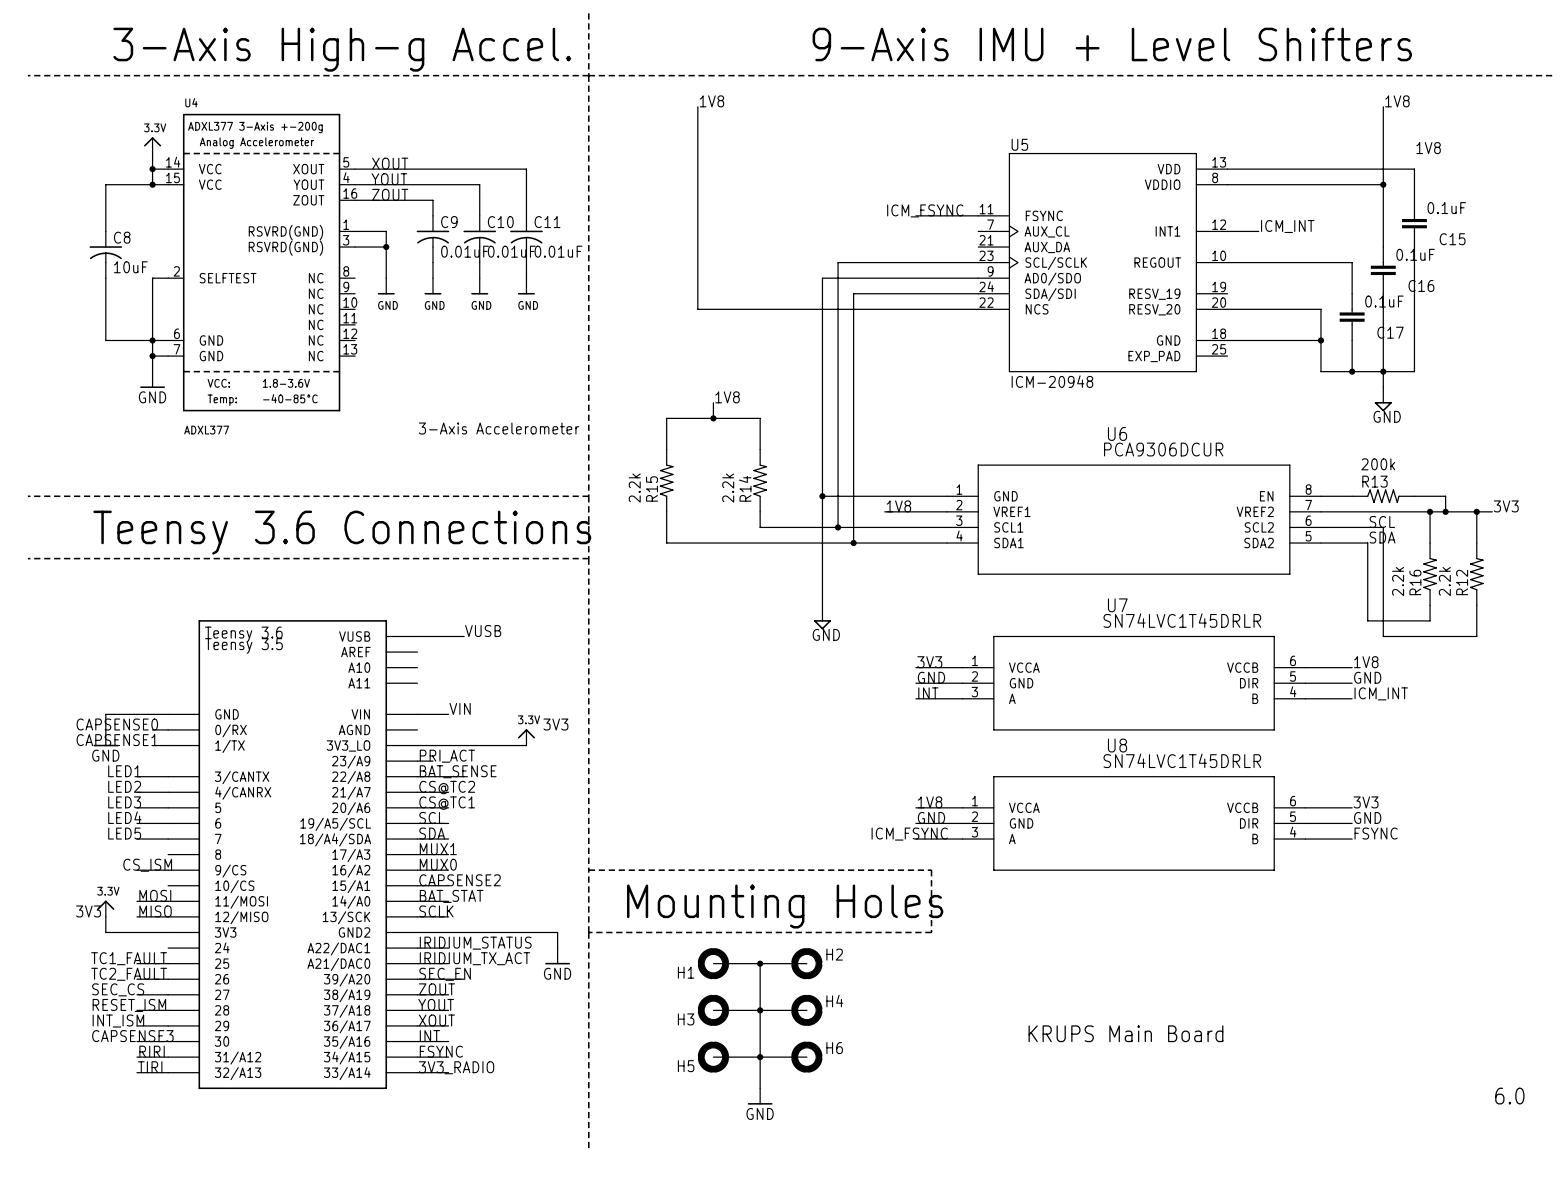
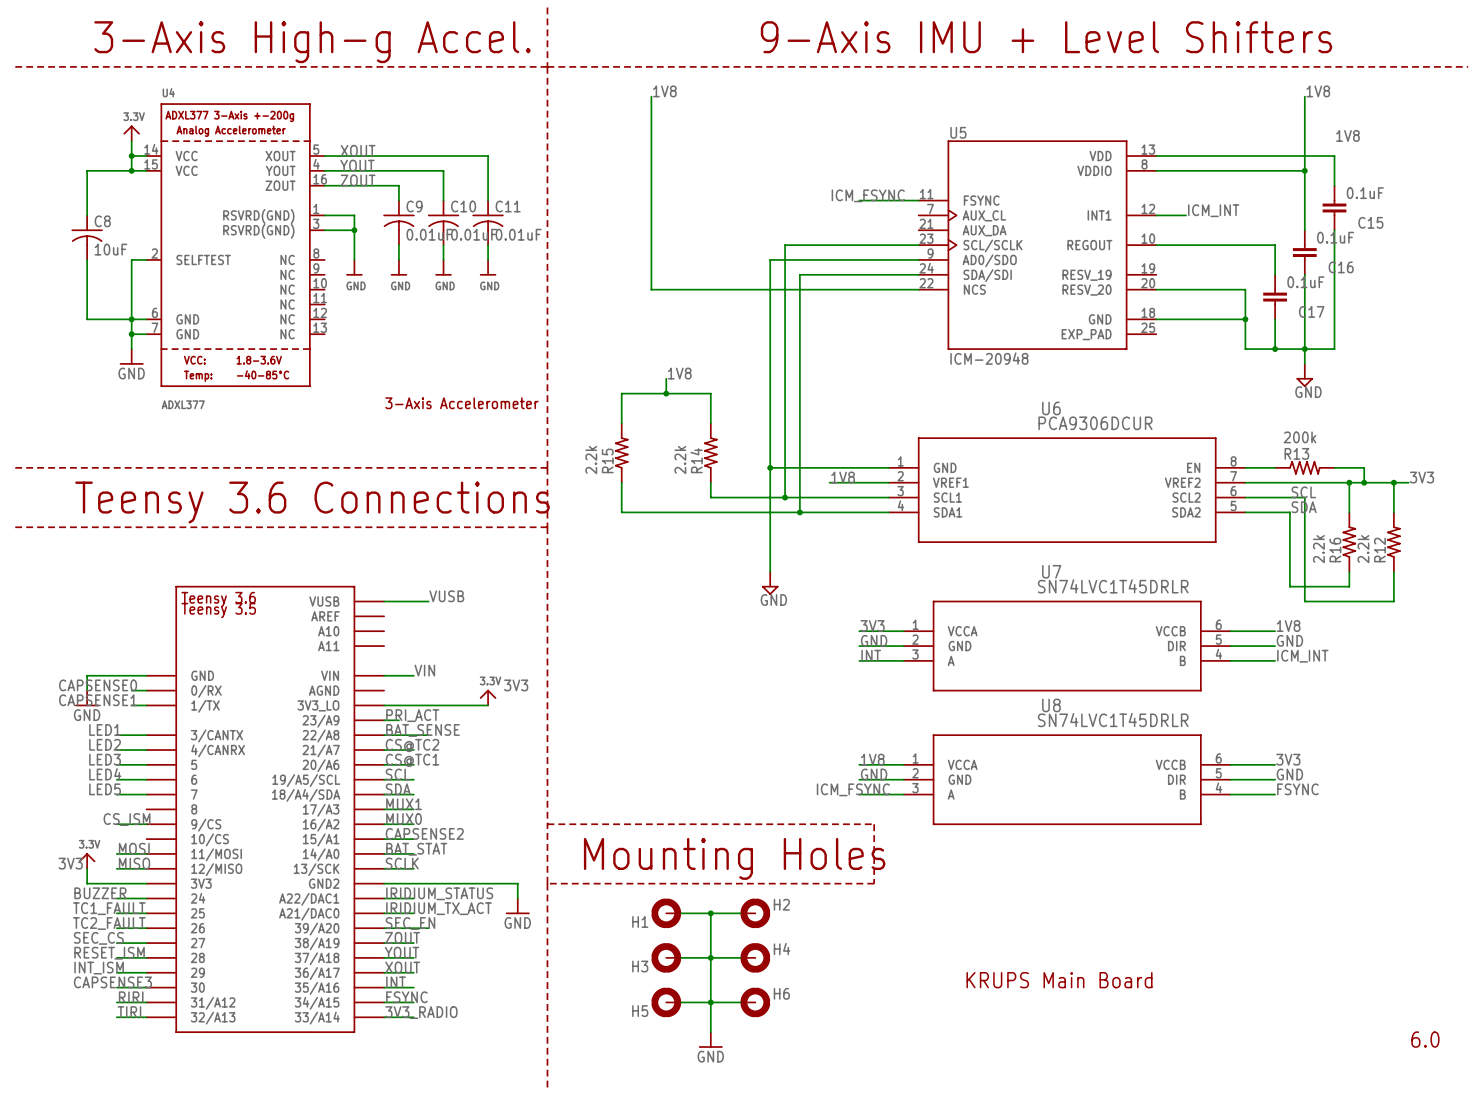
label: none -> BUZZER (100, 893)
wire: none -> (116, 898) (146, 898)

